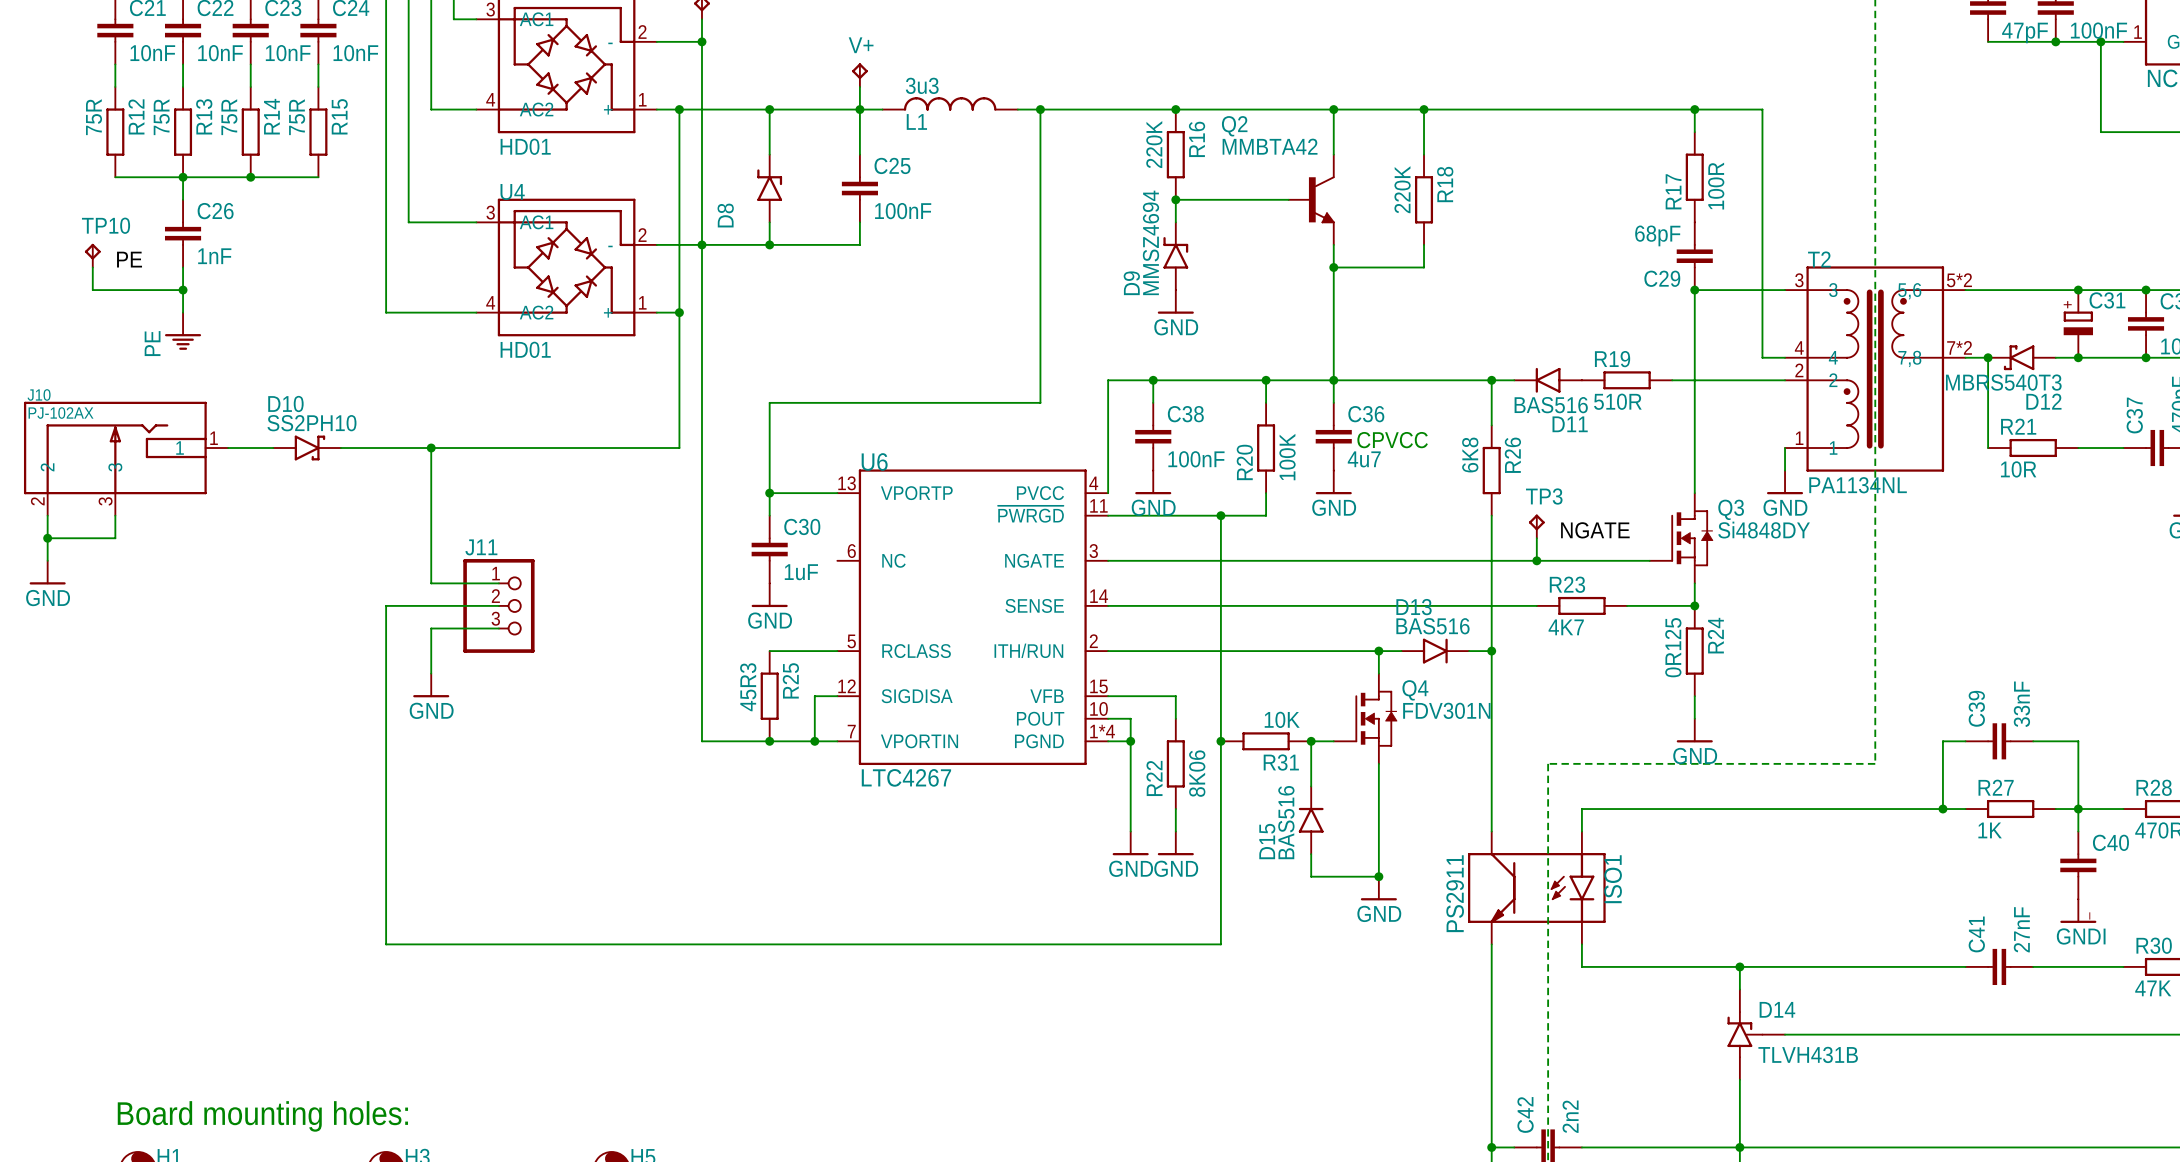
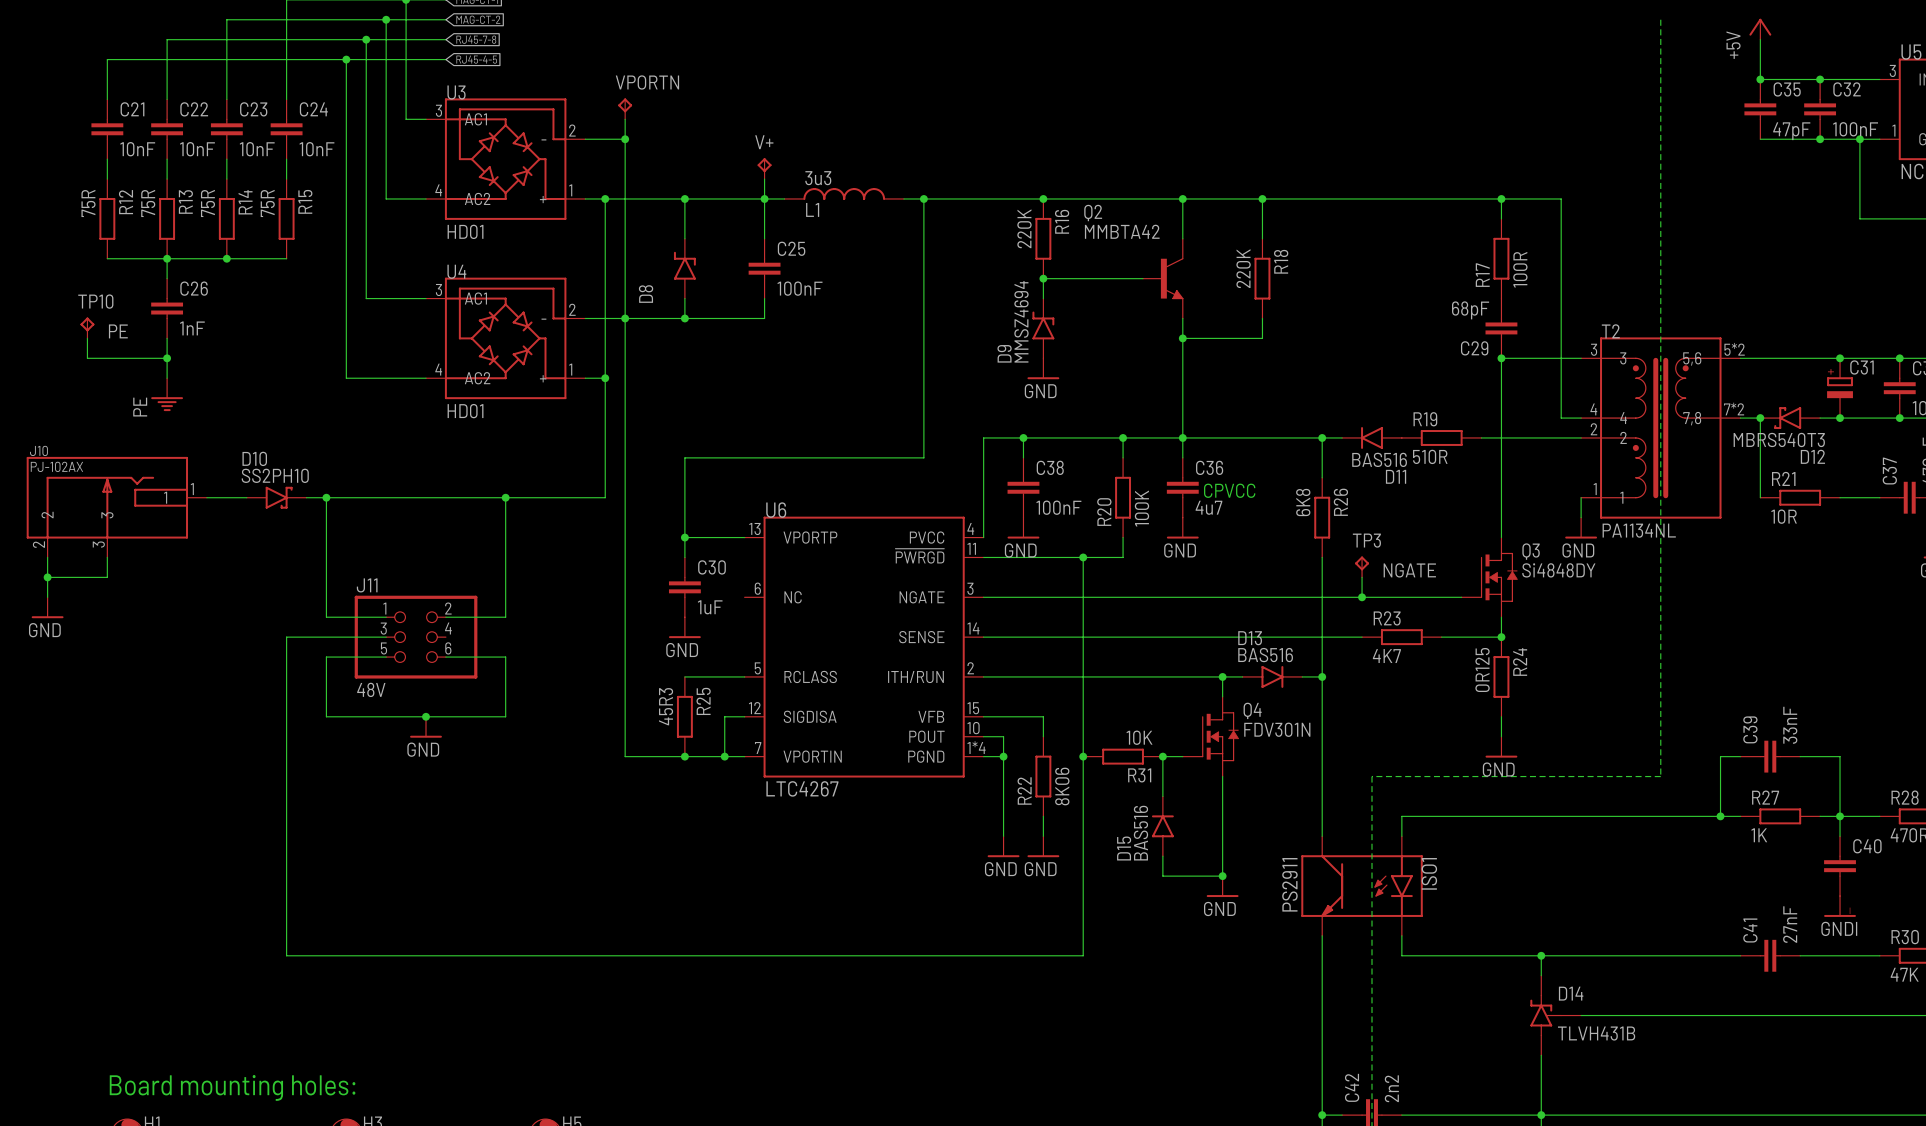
wire: none -> (326, 497) (326, 617) (386, 617)
junction: none -> (326, 497)
wire: (431, 448) (431, 583) (498, 583) -> (505, 497) (505, 617) (445, 617)
junction: (431, 448) -> none
junction: none -> (505, 497)
J11 name position: J11 (481, 547) -> J11 (367, 585)
J11 symbol: [463, 559, 535, 653] -> [354, 595, 478, 679]
wire: (386, 605) (386, 944) (1220, 944) -> (346, 637) (286, 637) (286, 955) (1083, 955) (1083, 935)
wire: (431, 605) (498, 605) -> none
wire: (498, 628) (431, 628) (431, 673) -> (445, 657) (505, 657) (505, 716) (326, 716) (326, 657) (386, 657)
J11 value: none -> 48V (371, 689)
power symbol position: GND (431, 685) -> GND (426, 727)
junction: none -> (426, 716)

